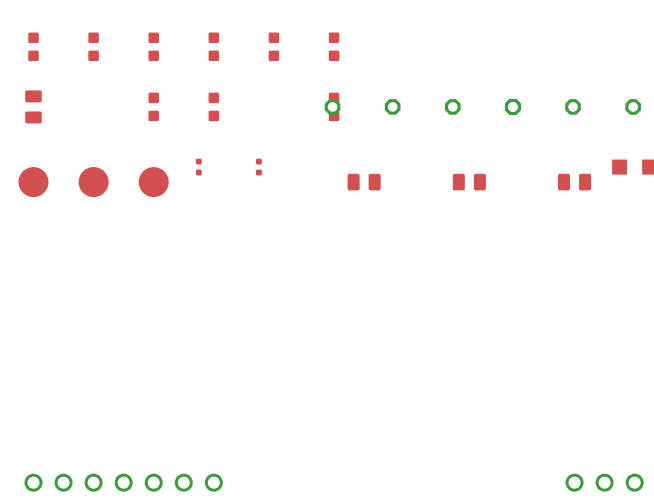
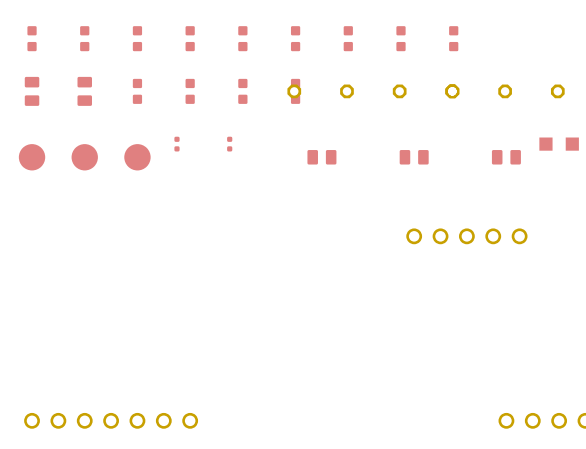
part: none -> (348, 38)
part: none -> (401, 38)
part: none -> (453, 38)
part: none -> (84, 91)
part: none -> (242, 91)
part: none -> (466, 236)

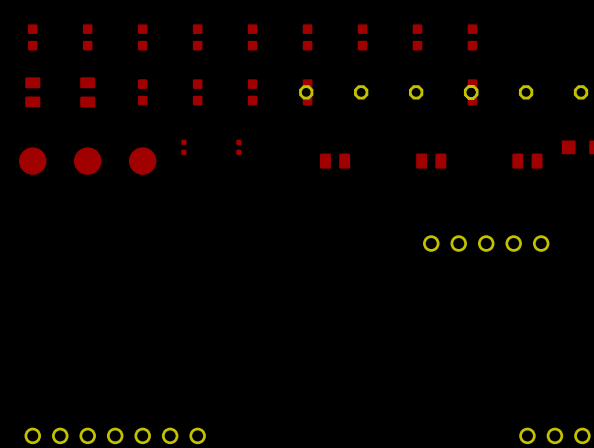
part: none -> (472, 92)

